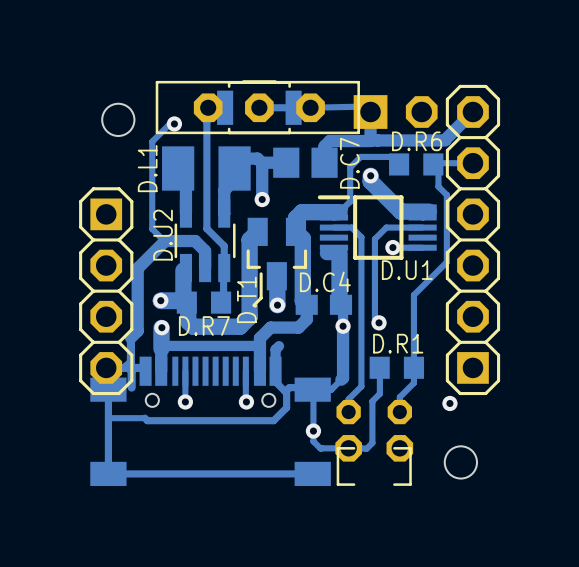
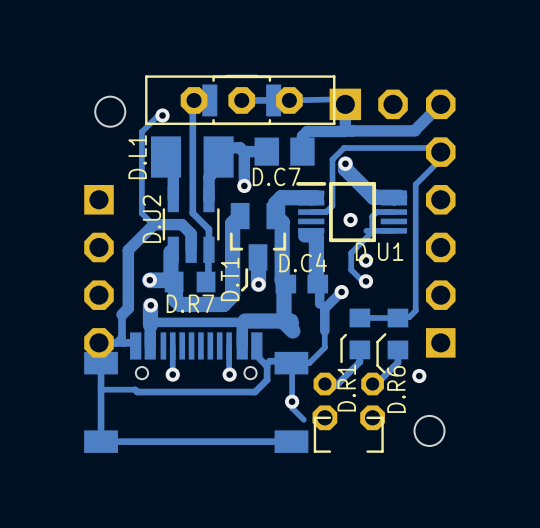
D.R6 name position: D.R6 (417, 141) -> D.R6 (396, 389)
D.C7 name rotation: 0° (349, 163) -> 90° clockwise (276, 176)
track: (472, 163) (433, 164) (438, 169) (438, 186) (446, 195) (446, 262) (413, 295) (413, 383) (399, 397) (399, 412) -> none
track: (399, 164) (391, 156) (360, 156) (350, 167) (350, 201) (339, 212) -> none
D.R6 rotation: 0° (416, 164) -> 90° clockwise (397, 333)
D.R6 position: (416, 164) -> (397, 333)
track: (349, 227) (361, 237) (361, 386) (348, 399) (348, 412) -> (326, 212) (332, 205) (332, 159) (344, 148) (436, 148) (440, 152) (440, 159) (415, 184) (415, 310) (409, 317) (397, 318)
track: (404, 227) (386, 227) (374, 239) (374, 318) (379, 322) -> (376, 212) (372, 216) (372, 231) (351, 253) (351, 269) (362, 281) (365, 281)
via: none -> (350, 219)
part side: bottom (472, 239) -> top (440, 223)
via: (392, 247) -> none
line: (261, 273) (261, 298) (253, 305) -> none
via: none -> (365, 260)
line: none -> (246, 269) (246, 285) (242, 290)
part side: bottom (106, 291) -> top (98, 271)
via: none -> (365, 281)
track: none -> (284, 284) (284, 322) (292, 330) (292, 322) (290, 321) (245, 321) (242, 323) (242, 346)
track: (306, 304) (306, 319) (298, 327) (270, 327) (259, 338) (259, 346) -> none
via position: (379, 322) -> (341, 292)
track: (342, 326) (343, 378) (331, 389) -> (341, 292) (324, 308) (324, 347) (308, 363)
via: (343, 326) -> none
track: none -> (397, 317) (359, 317)
D.R1 name position: D.R1 (398, 343) -> D.R1 (346, 388)
track: (279, 346) (275, 349) (275, 371) -> none
line: none -> (385, 334) (377, 341) (377, 365) (384, 372)
line: none -> (345, 334) (341, 339) (341, 361)
track: (127, 366) (131, 370) (131, 387) -> none
track: (379, 367) (379, 393) (372, 401) (372, 443) (366, 448) (320, 448) (313, 441) (313, 437) -> (303, 419) (292, 408)
D.R1 rotation: 0° (396, 367) -> 90° clockwise (359, 333)
track: none -> (359, 349) (359, 361) (336, 385) (323, 385)
track: none -> (397, 349) (397, 362) (374, 385) (370, 385)

